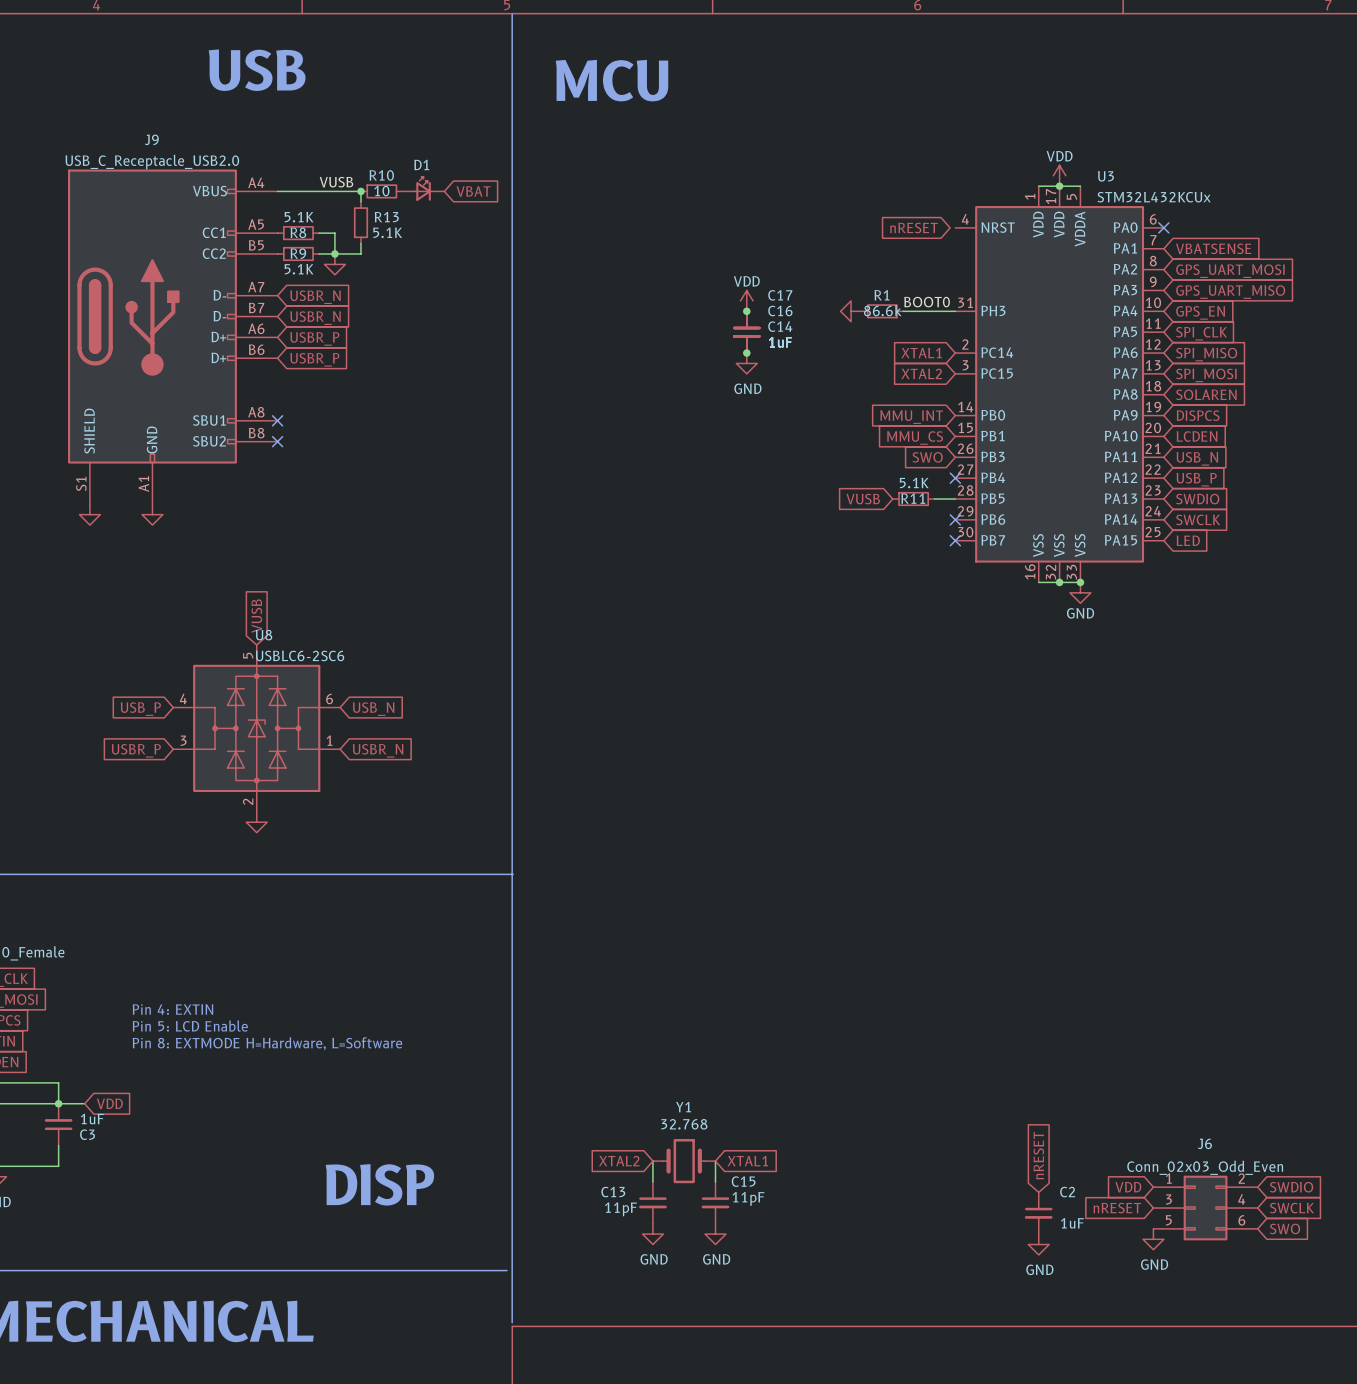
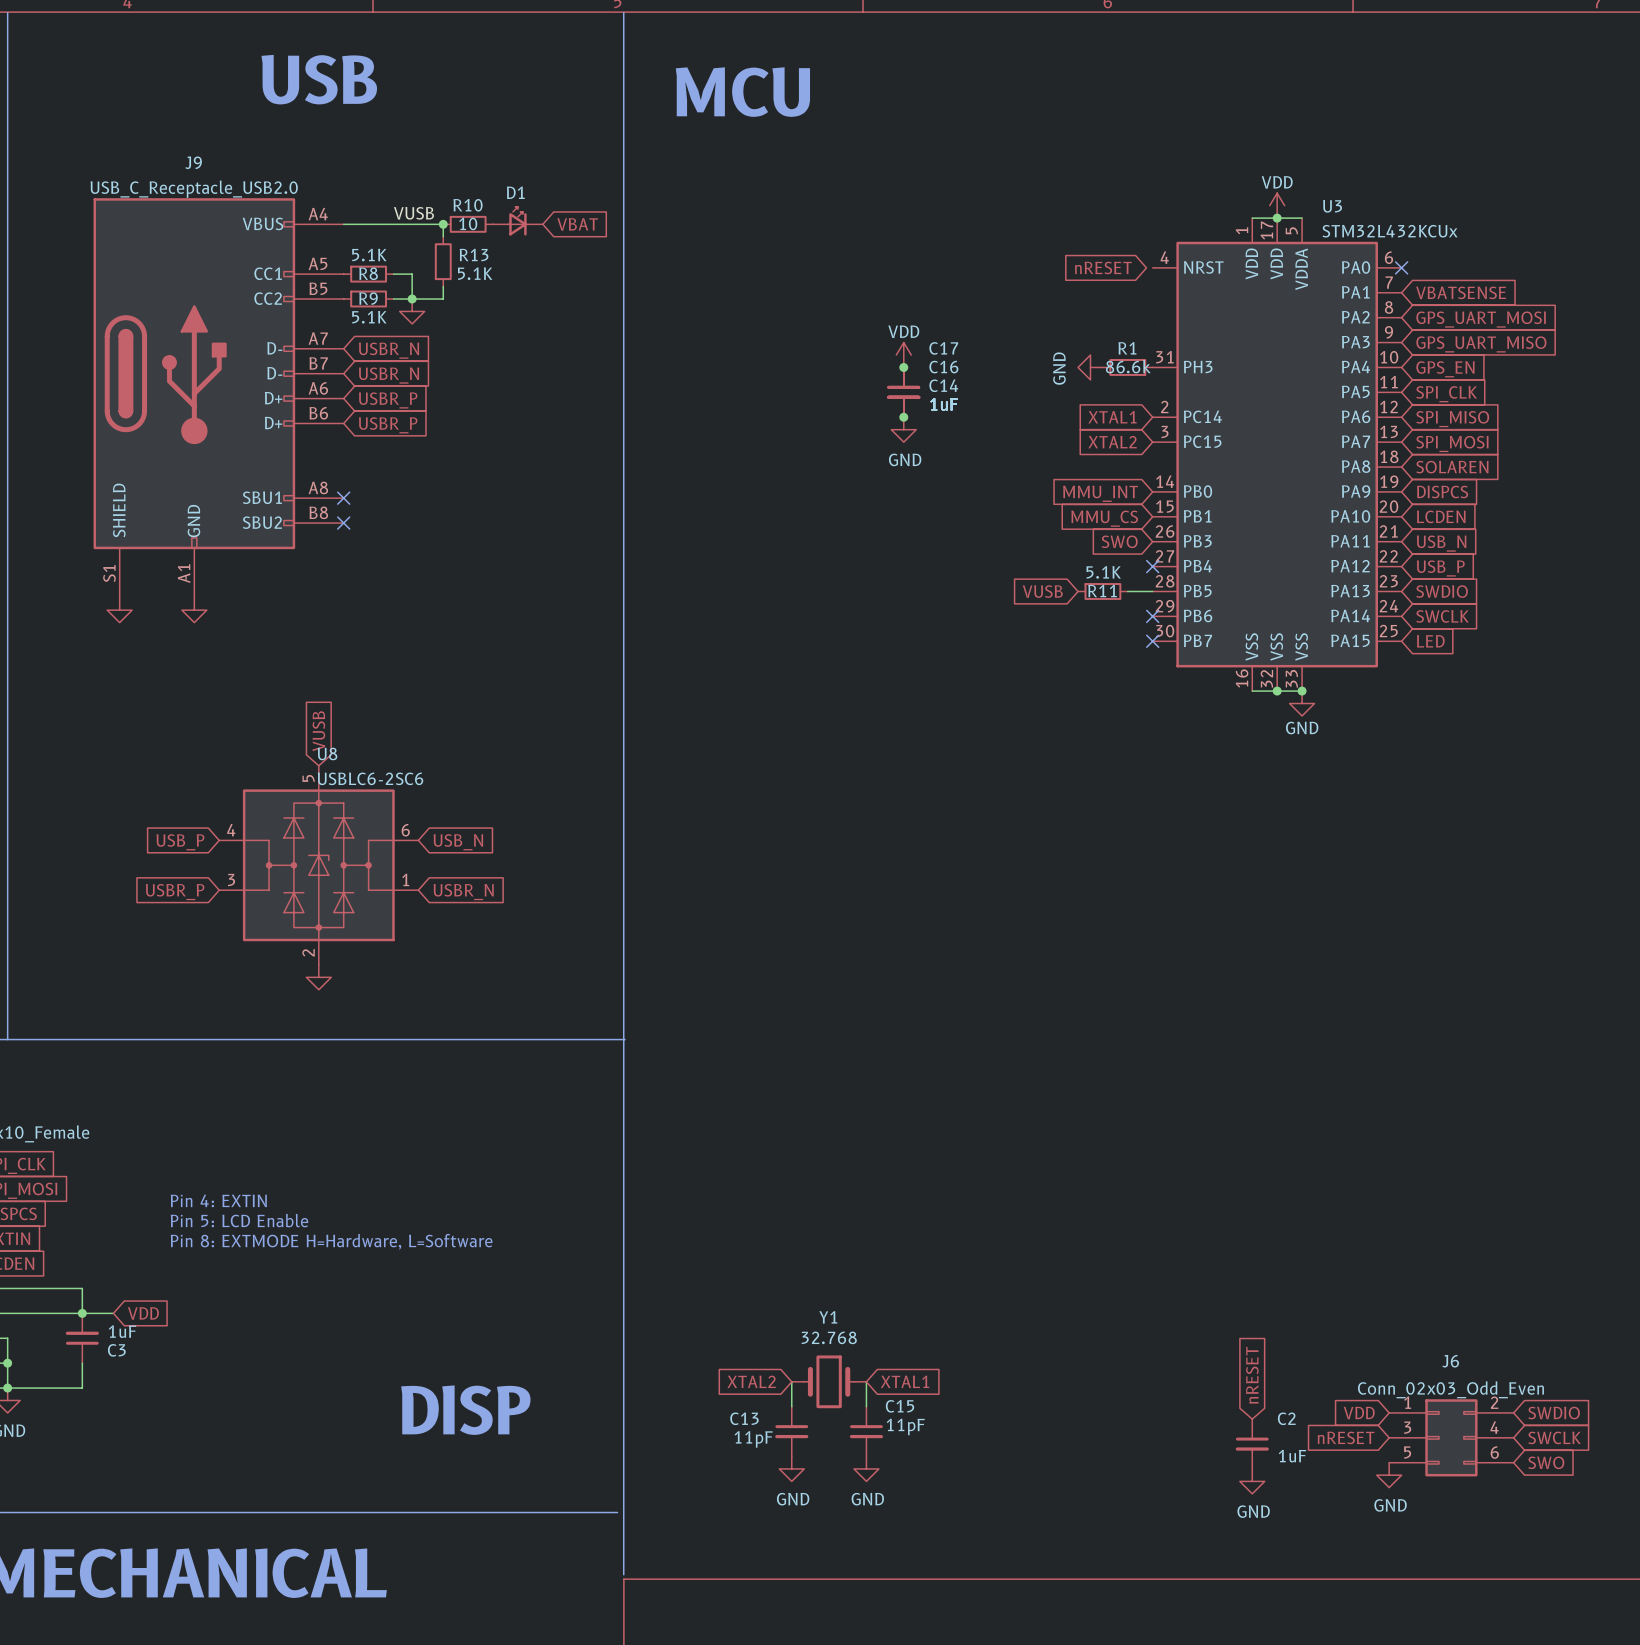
label: BOOT0 (927, 302) -> none
power symbol: (851, 311) -> none
R1 position: (882, 311) -> (1127, 367)
power symbol: none -> GND (1090, 367)

